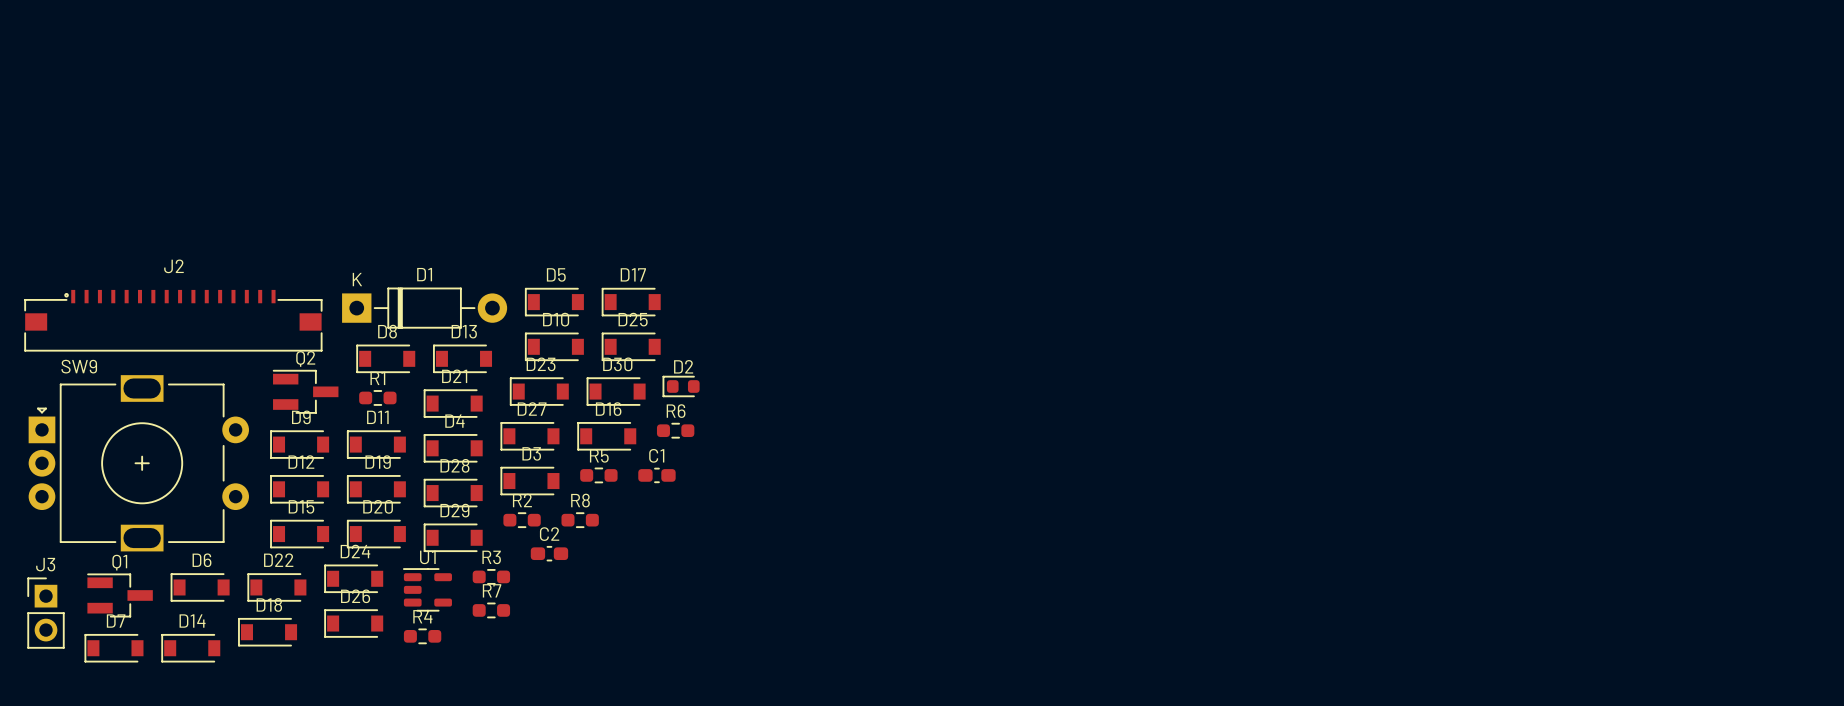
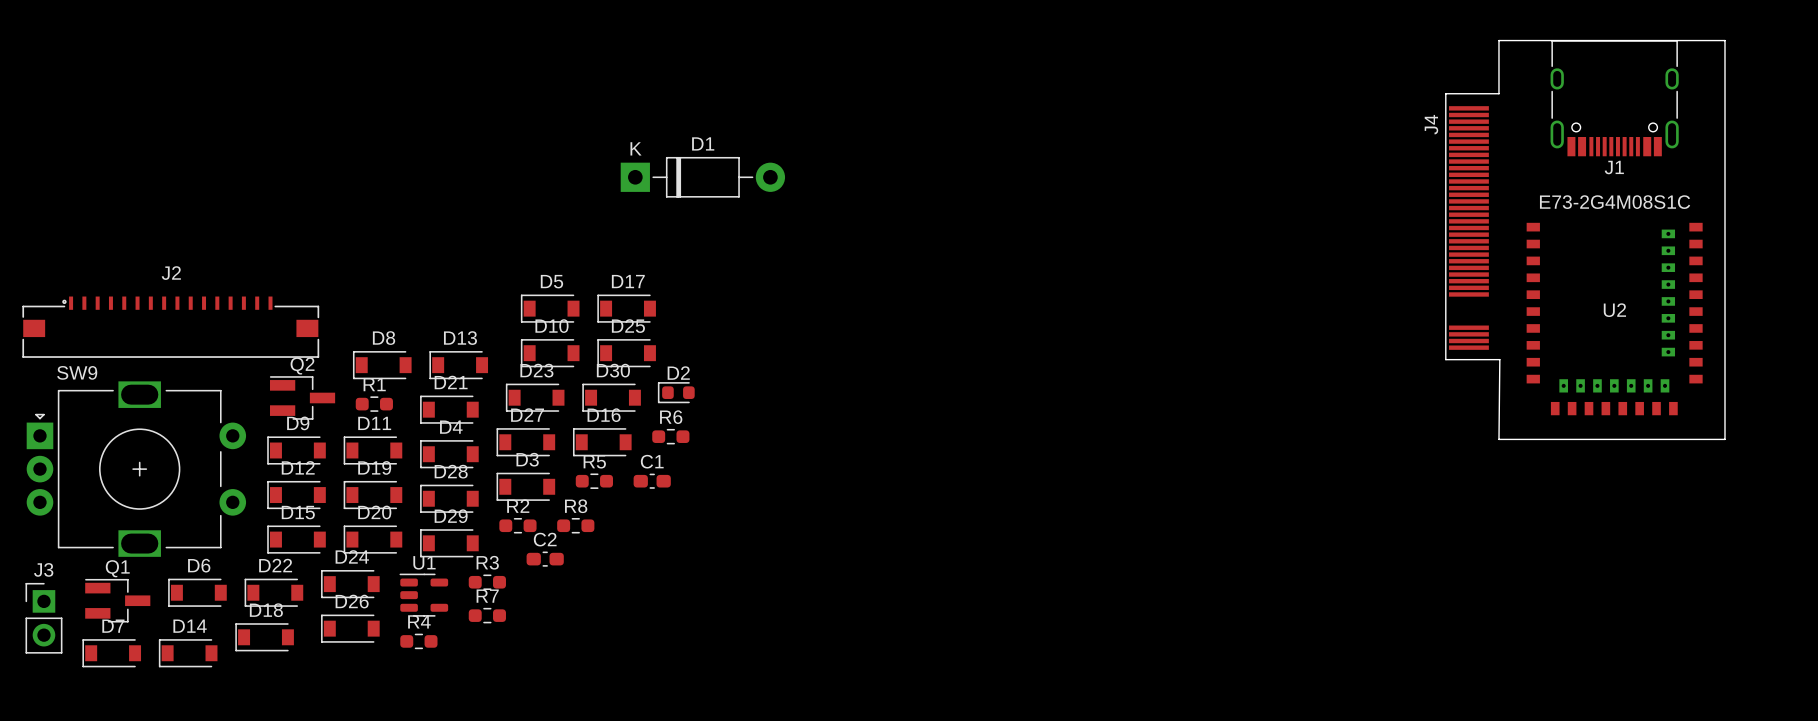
board edge: none -> (1498, 40) (1498, 93) (1445, 93) (1445, 359) (1499, 359) (1498, 439) (1724, 439) (1724, 40) (1498, 40)
J1: none -> (1614, 98)
J4: none -> (1468, 228)
D1 position: (424, 308) -> (702, 177)
U2: none -> (1614, 319)

